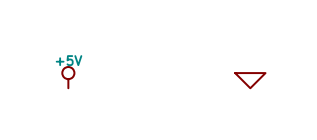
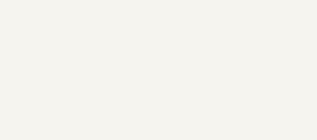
power symbol: +5V (68, 77) -> none
power symbol: (250, 80) -> none

